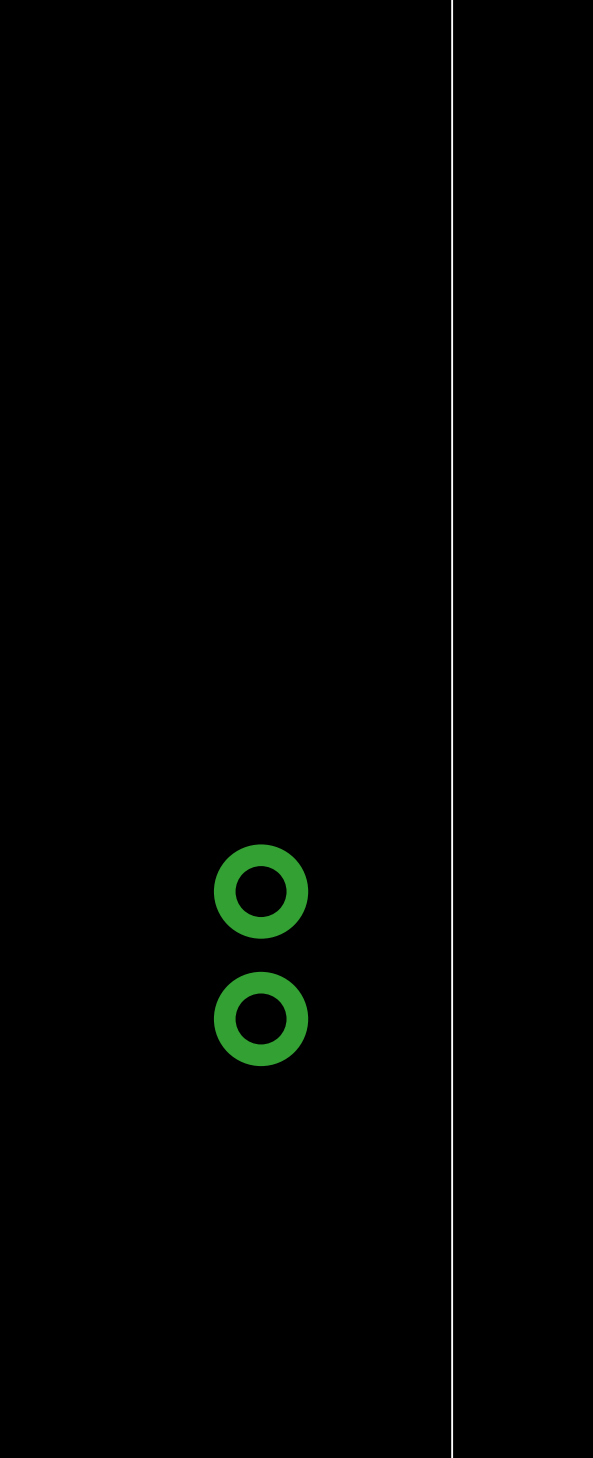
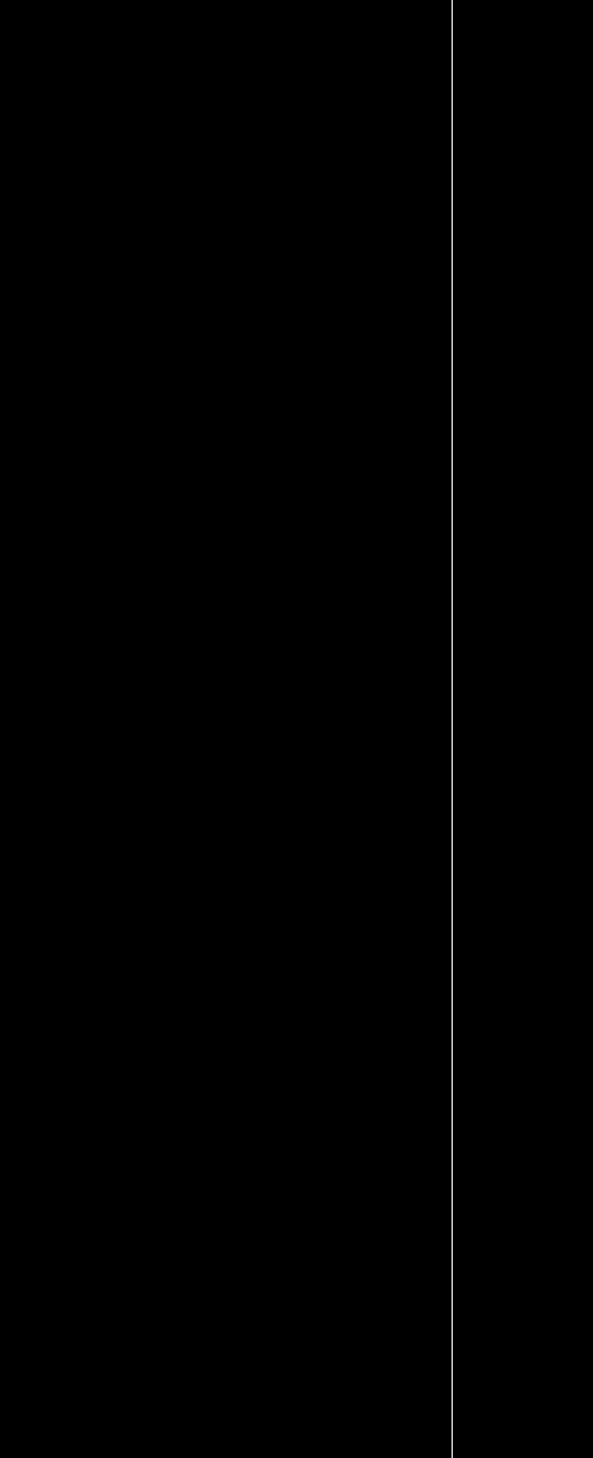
part: (261, 955) -> none

